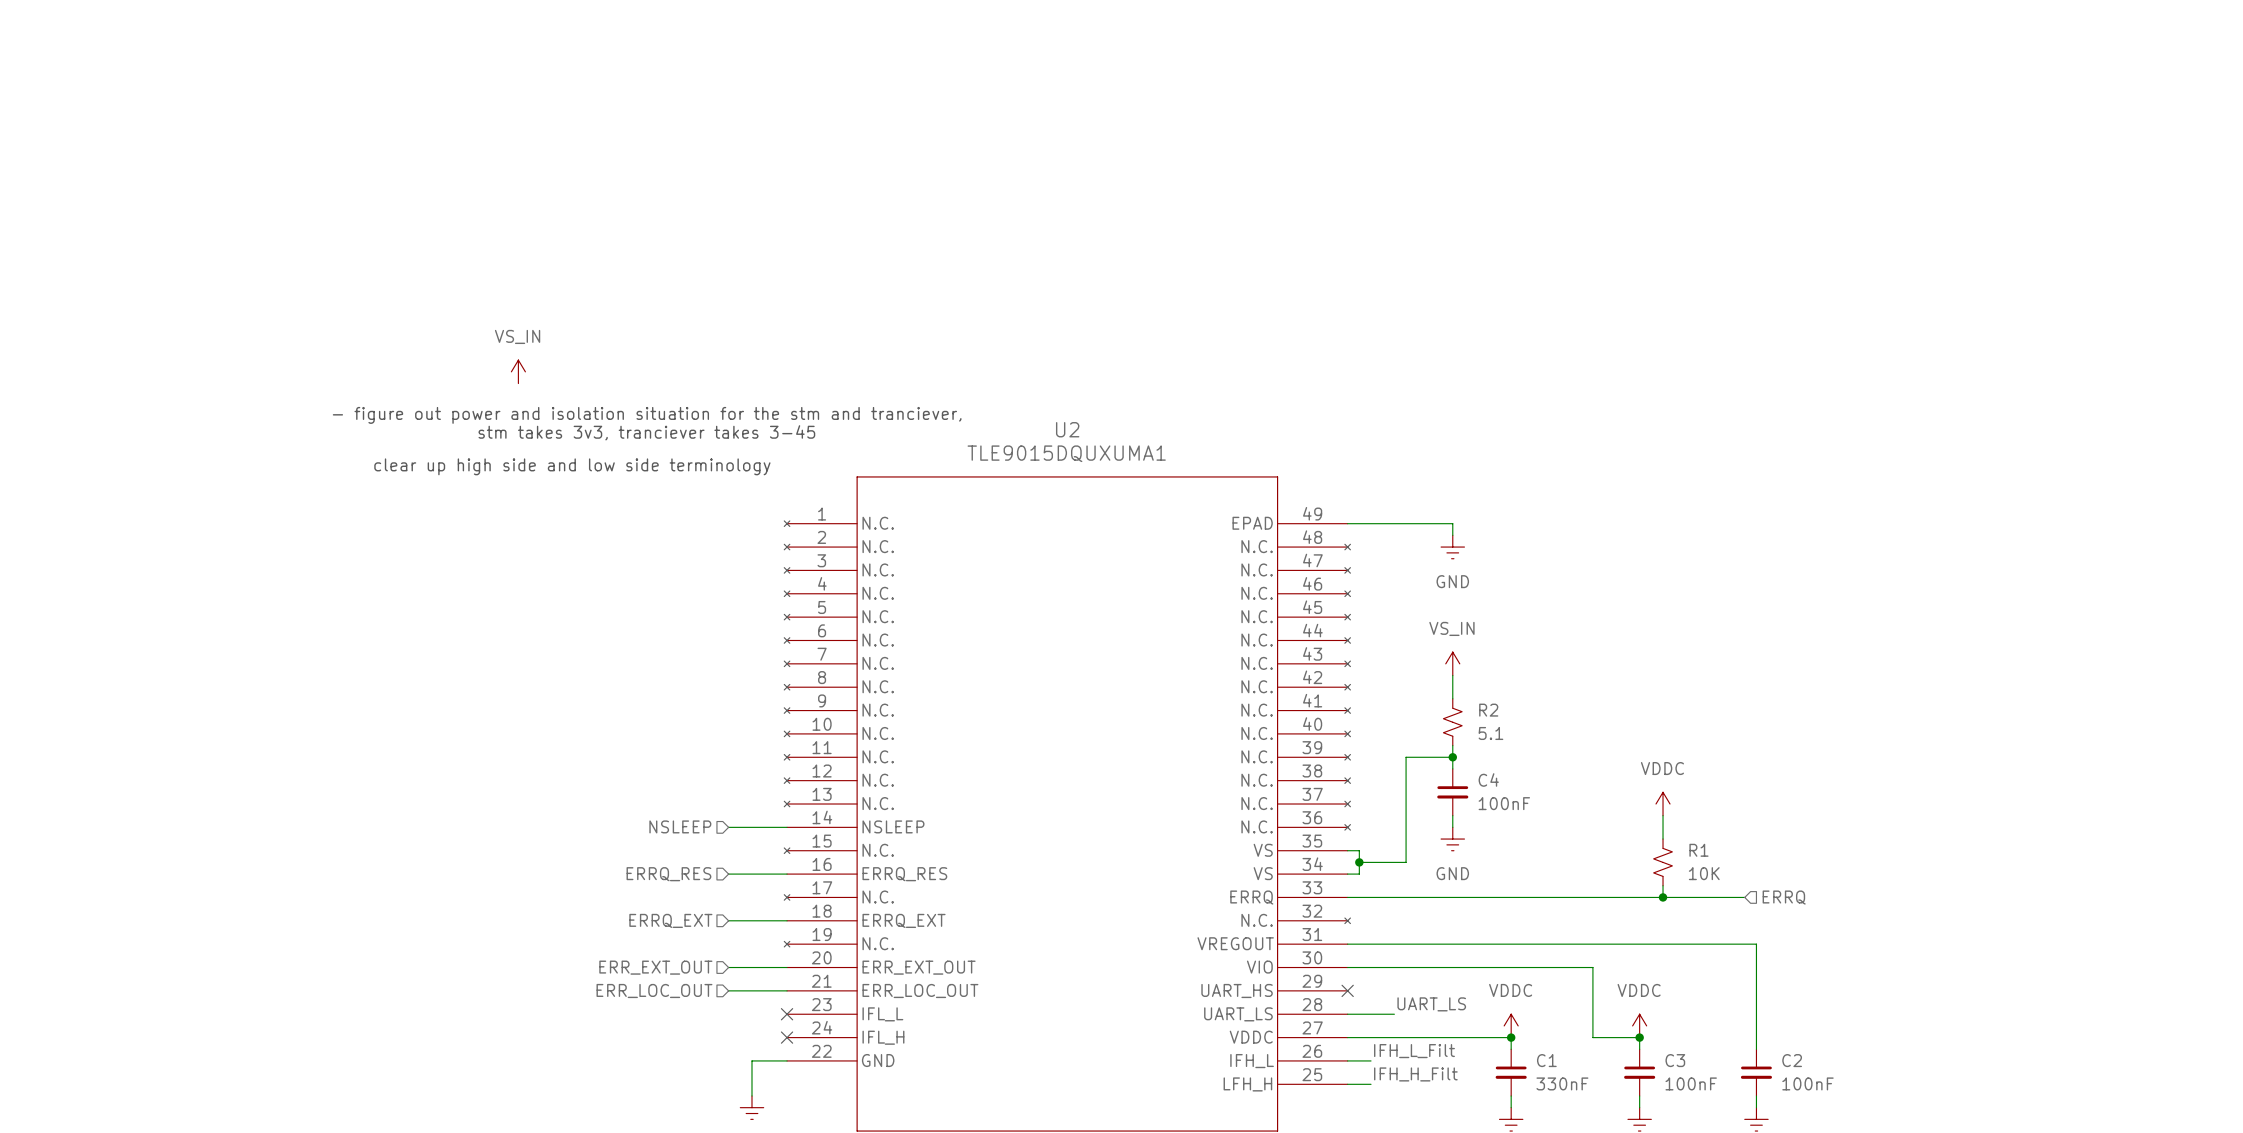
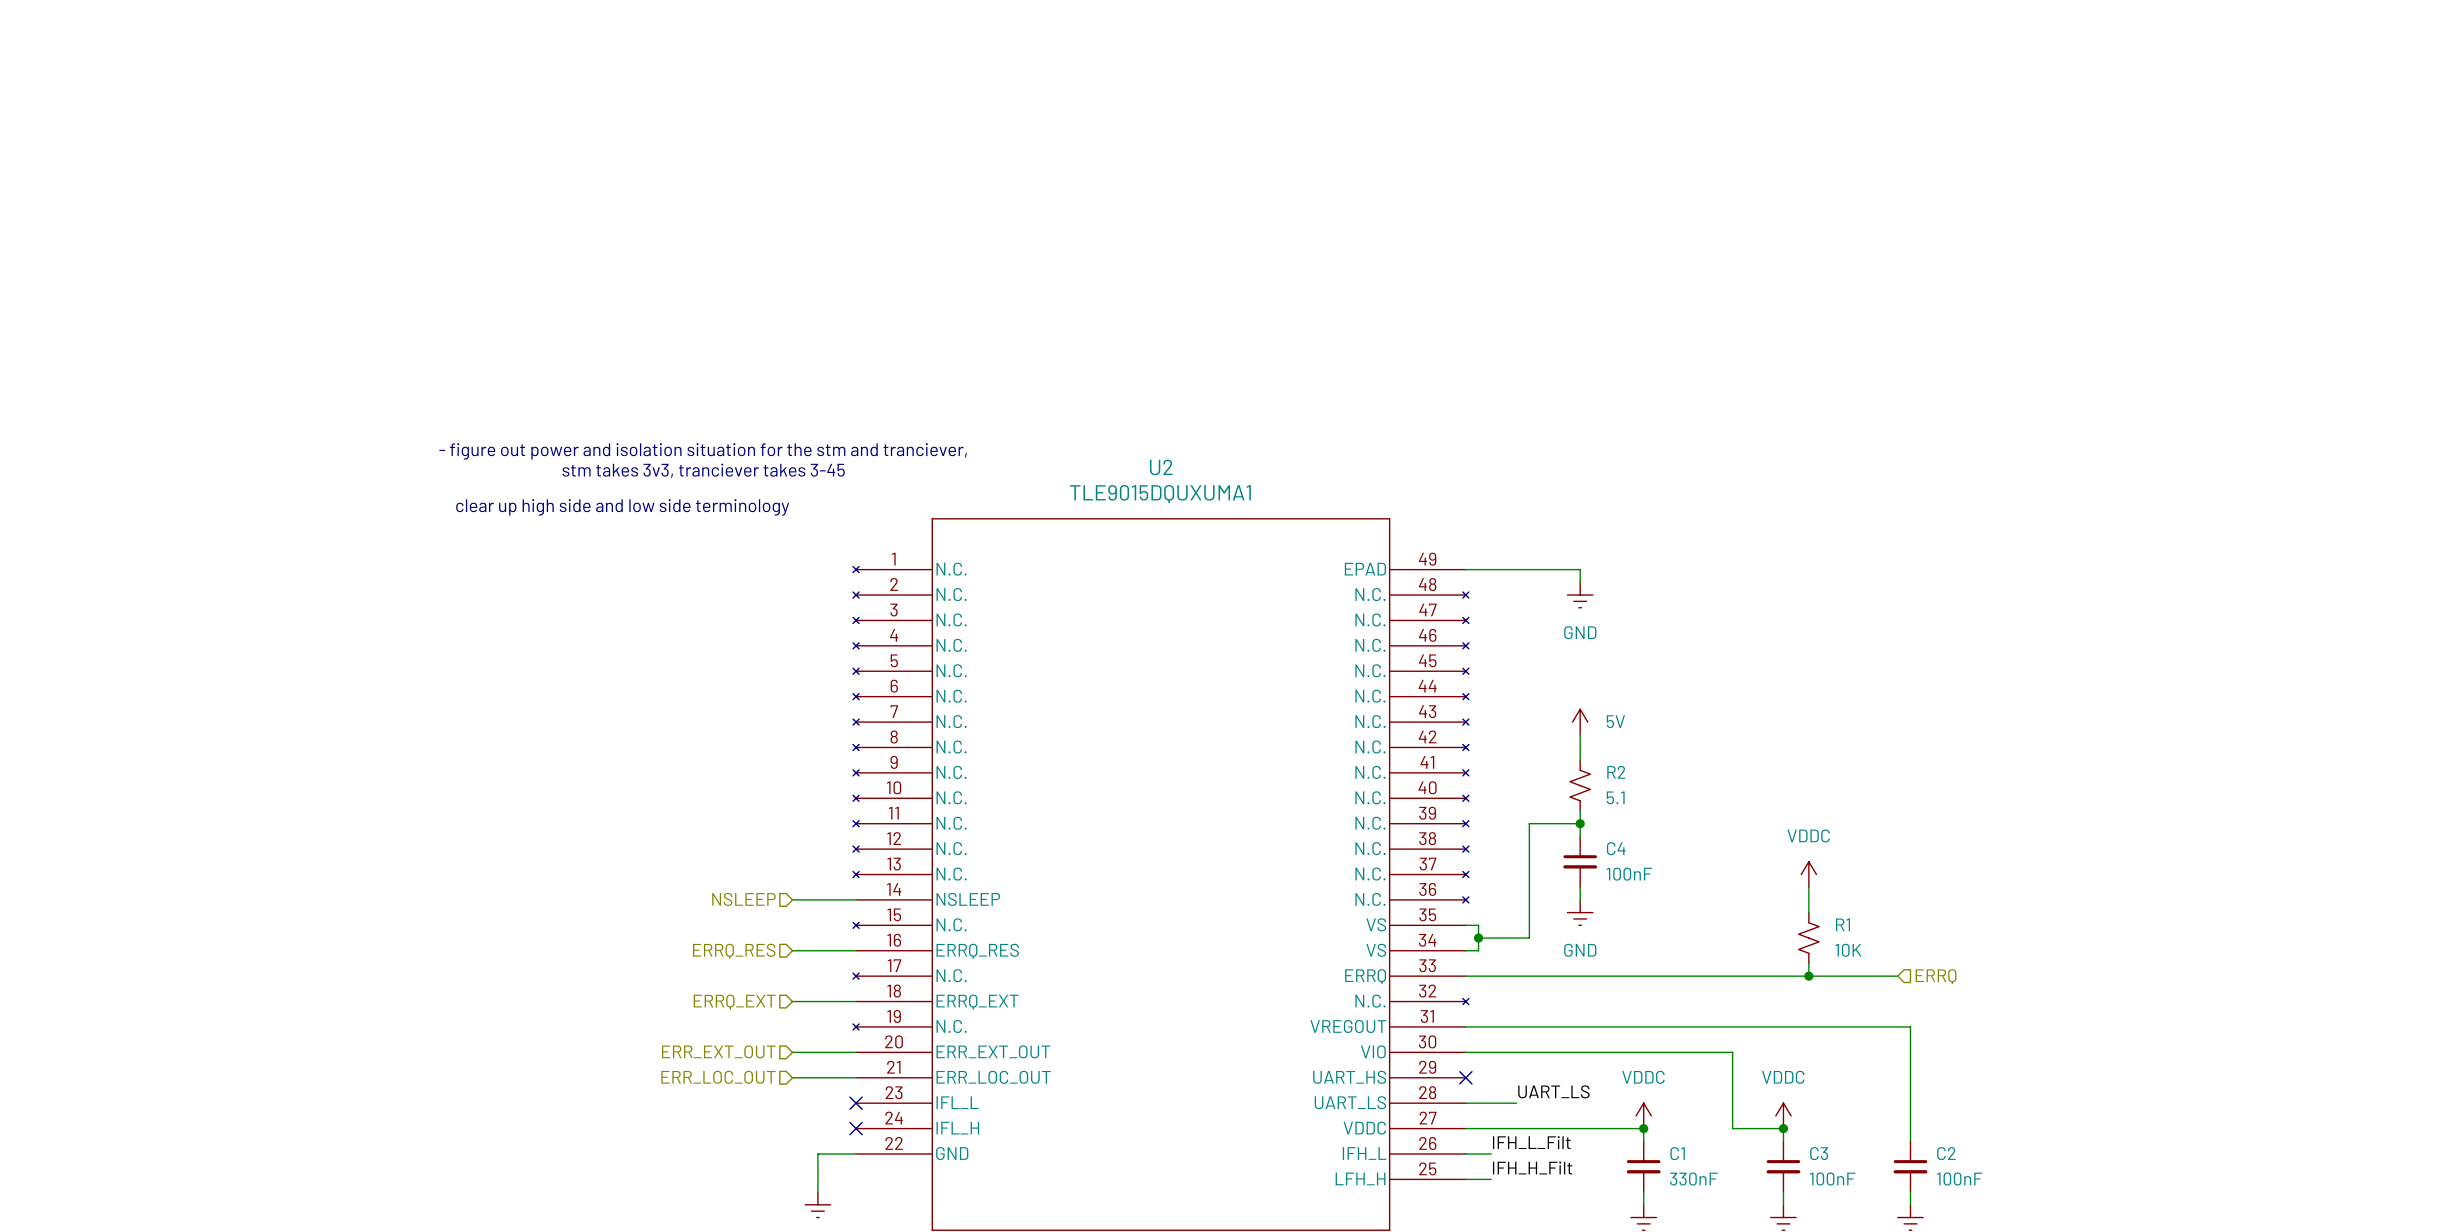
power symbol: VS_IN (518, 371) -> none
power symbol: VS_IN (1452, 663) -> 5V (1580, 722)

